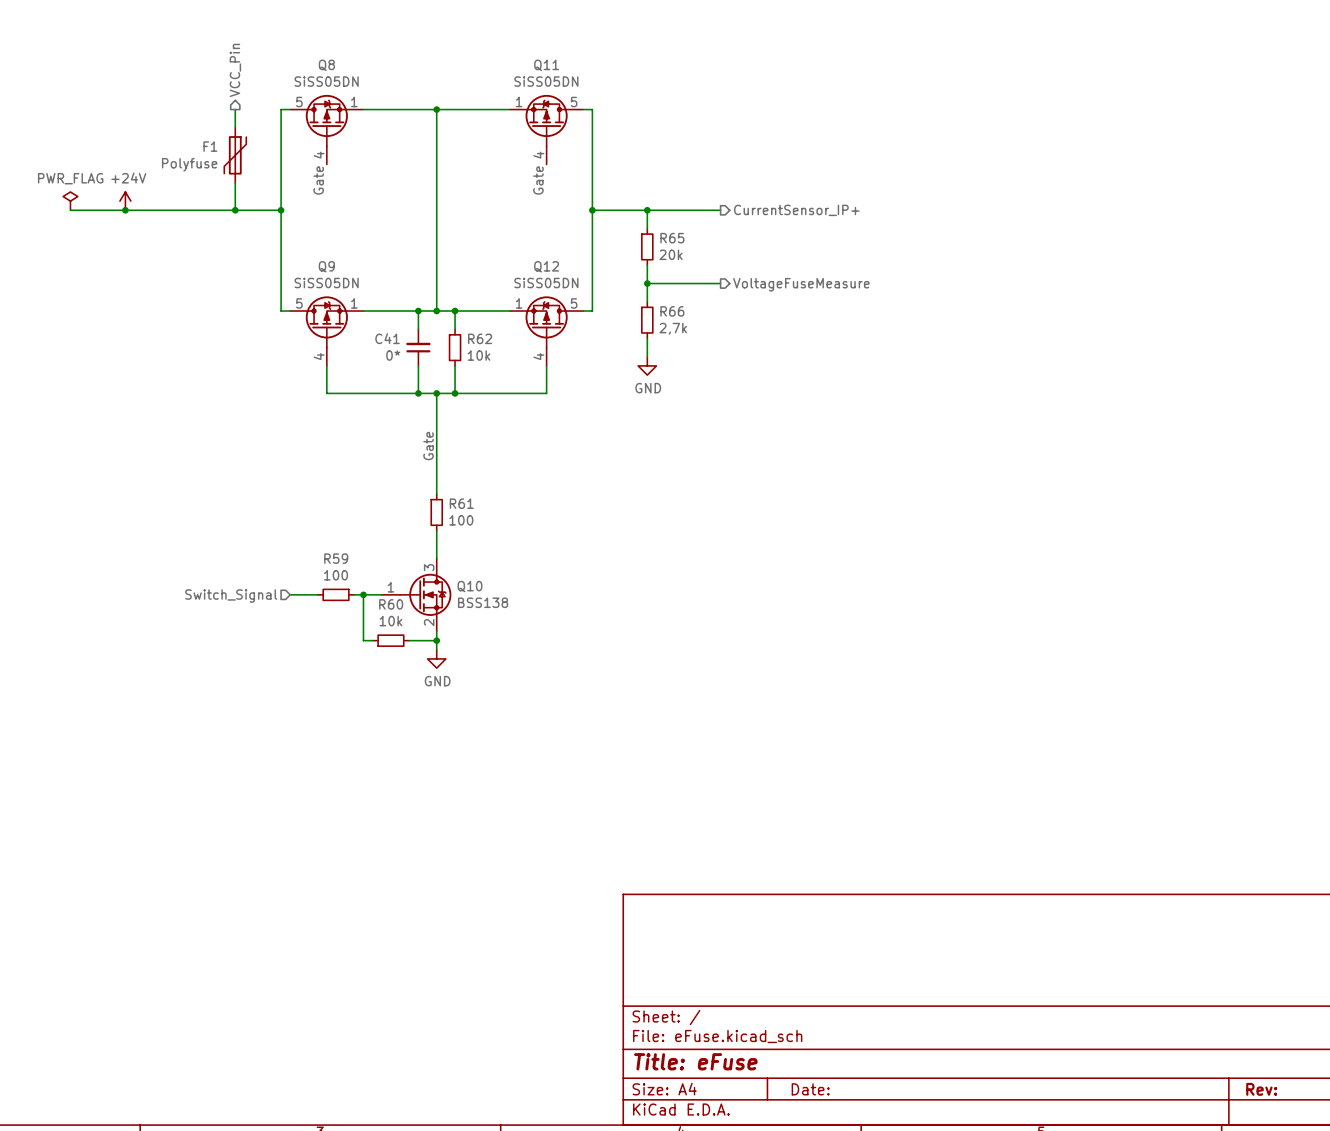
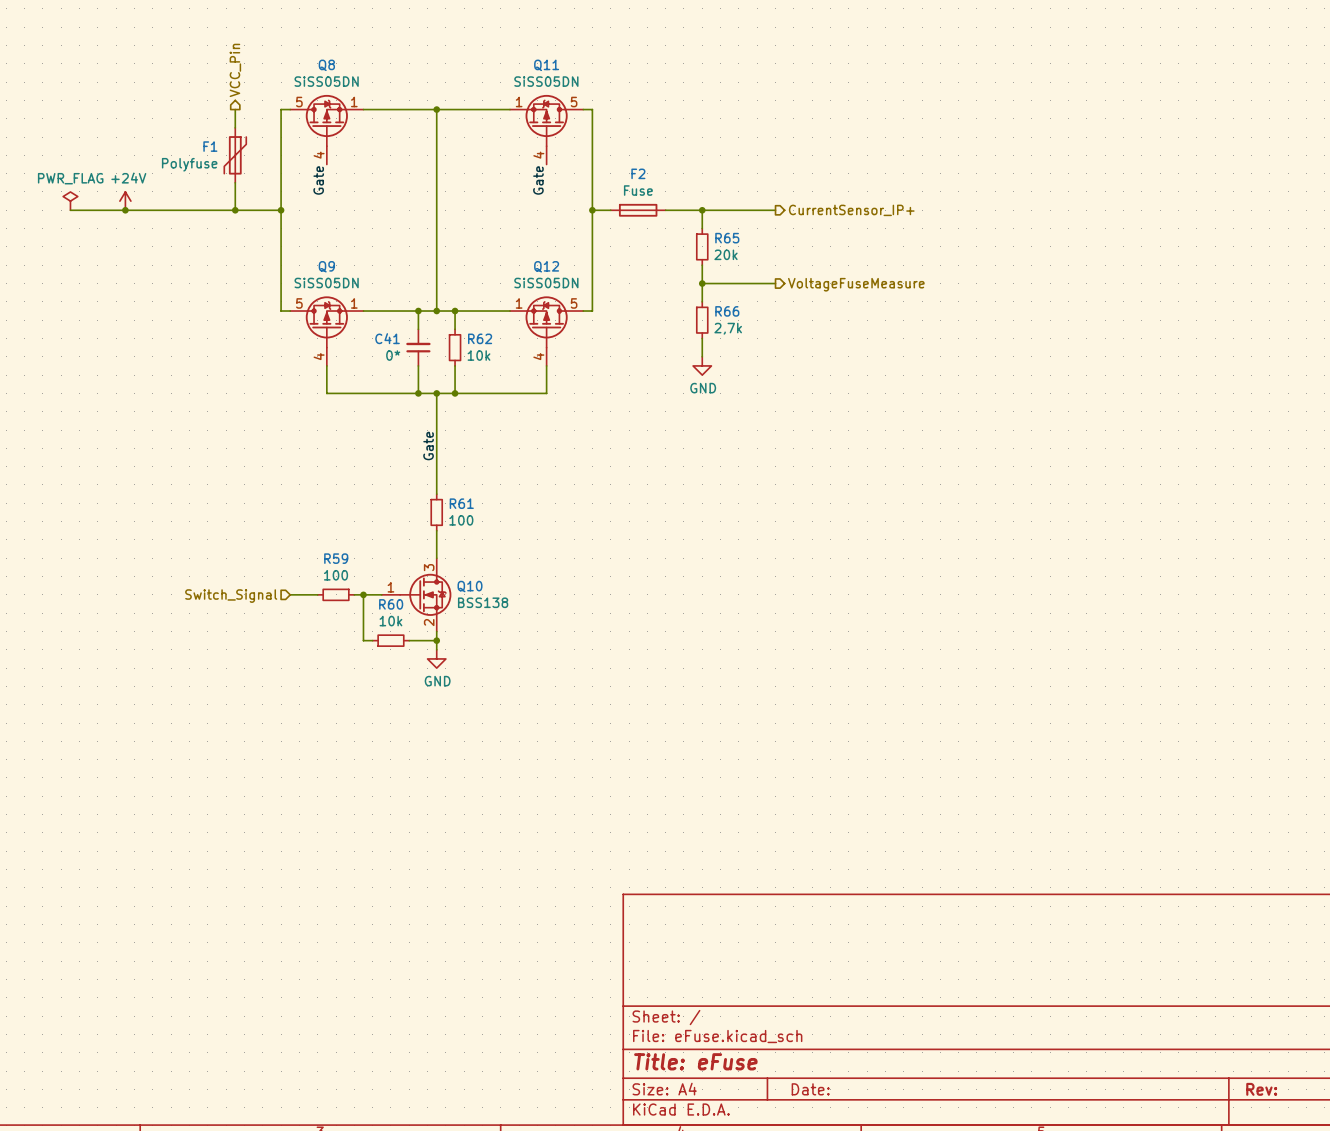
F2: none -> Fuse (638, 210)
wire: (647, 210) (647, 228) -> (702, 210) (702, 228)
junction: (647, 210) -> none
junction: none -> (702, 210)
hierarchical label position: CurrentSensor_IP+ (796, 210) -> CurrentSensor_IP+ (851, 210)
R65 position: (647, 246) -> (702, 246)
wire: (647, 265) (647, 301) -> (702, 265) (702, 301)
wire: (647, 283) (702, 283) -> (720, 283) (775, 283)
junction: (647, 283) -> none
junction: none -> (702, 283)
hierarchical label position: VoltageFuseMeasure (801, 284) -> VoltageFuseMeasure (856, 284)
R66 position: (647, 320) -> (702, 320)
wire: (647, 338) (647, 356) -> (702, 338) (702, 356)
power symbol position: GND (647, 365) -> GND (702, 365)

